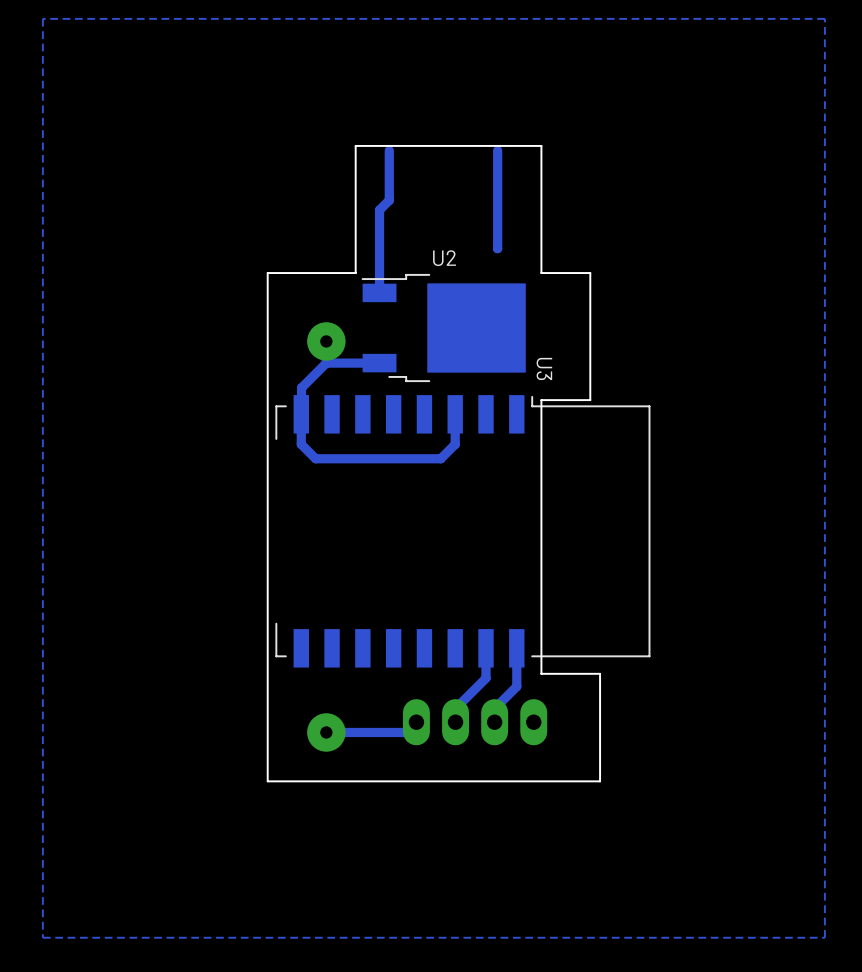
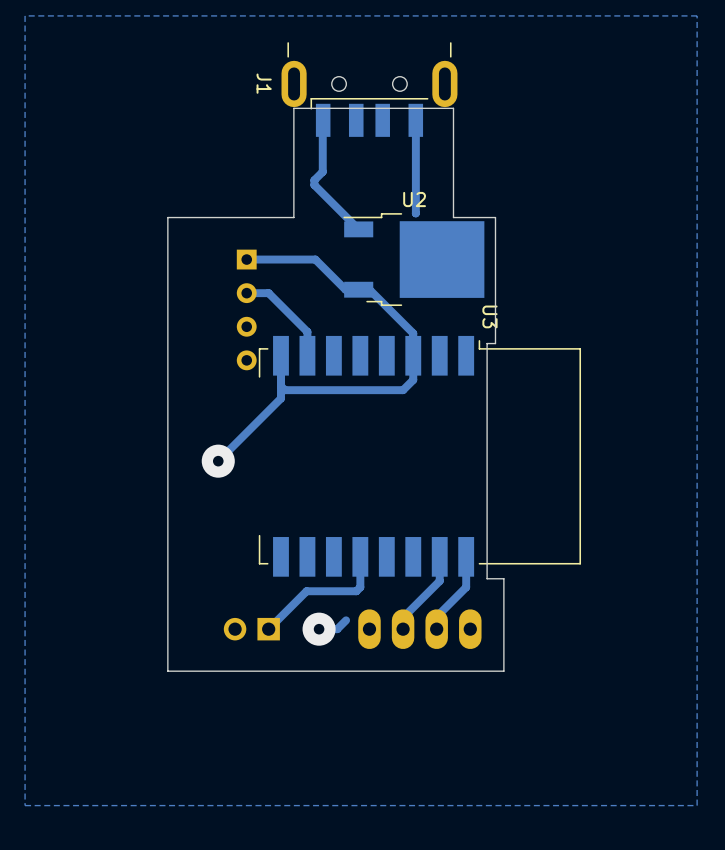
J1: none -> (369, 89)
board edge: (541, 145) (355, 145) -> (453, 125) (453, 108) (293, 108) (293, 125)
track: (379, 215) (379, 292) -> (314, 185) (358, 229)
board edge: (355, 253) (355, 273) (267, 273) (267, 781) -> (293, 217) (167, 217) (167, 671) (218, 671)
board edge: (541, 253) (541, 273) (590, 273) -> (453, 217) (495, 217) (495, 234)
track: none -> (244, 259) (315, 259) (345, 289) (369, 289) (413, 333) (413, 379) (403, 390) (284, 390) (280, 386)
U2 position: (443, 328) -> (413, 259)
track: none -> (244, 293) (268, 293) (307, 331) (307, 355)
via: (326, 341) -> none
part: none -> (246, 309)
track: (326, 363) (301, 387) (301, 444) (315, 458) (440, 458) (455, 444) (455, 414) -> none
track: (379, 363) (326, 363) -> none
U3 footprint: [275, 395, 651, 668] -> [258, 335, 582, 577]
board edge: (580, 400) (541, 400) (541, 673) (580, 673) -> (487, 343) (487, 578)
track: none -> (280, 355) (280, 398) (218, 461)
via: none -> (218, 461)
track: (486, 648) (486, 678) (455, 708) (455, 722) -> none
track: (516, 648) (516, 686) (494, 708) (494, 722) -> none
track: none -> (439, 556) (439, 581) (403, 617) (403, 629)
track: none -> (466, 556) (466, 587) (436, 616) (436, 629)
part: (475, 722) -> none
part: none -> (251, 629)
via position: (326, 732) -> (319, 629)
track: (385, 732) (326, 732) -> (360, 556) (360, 587) (356, 591) (306, 591) (268, 629)
part: none -> (419, 629)

